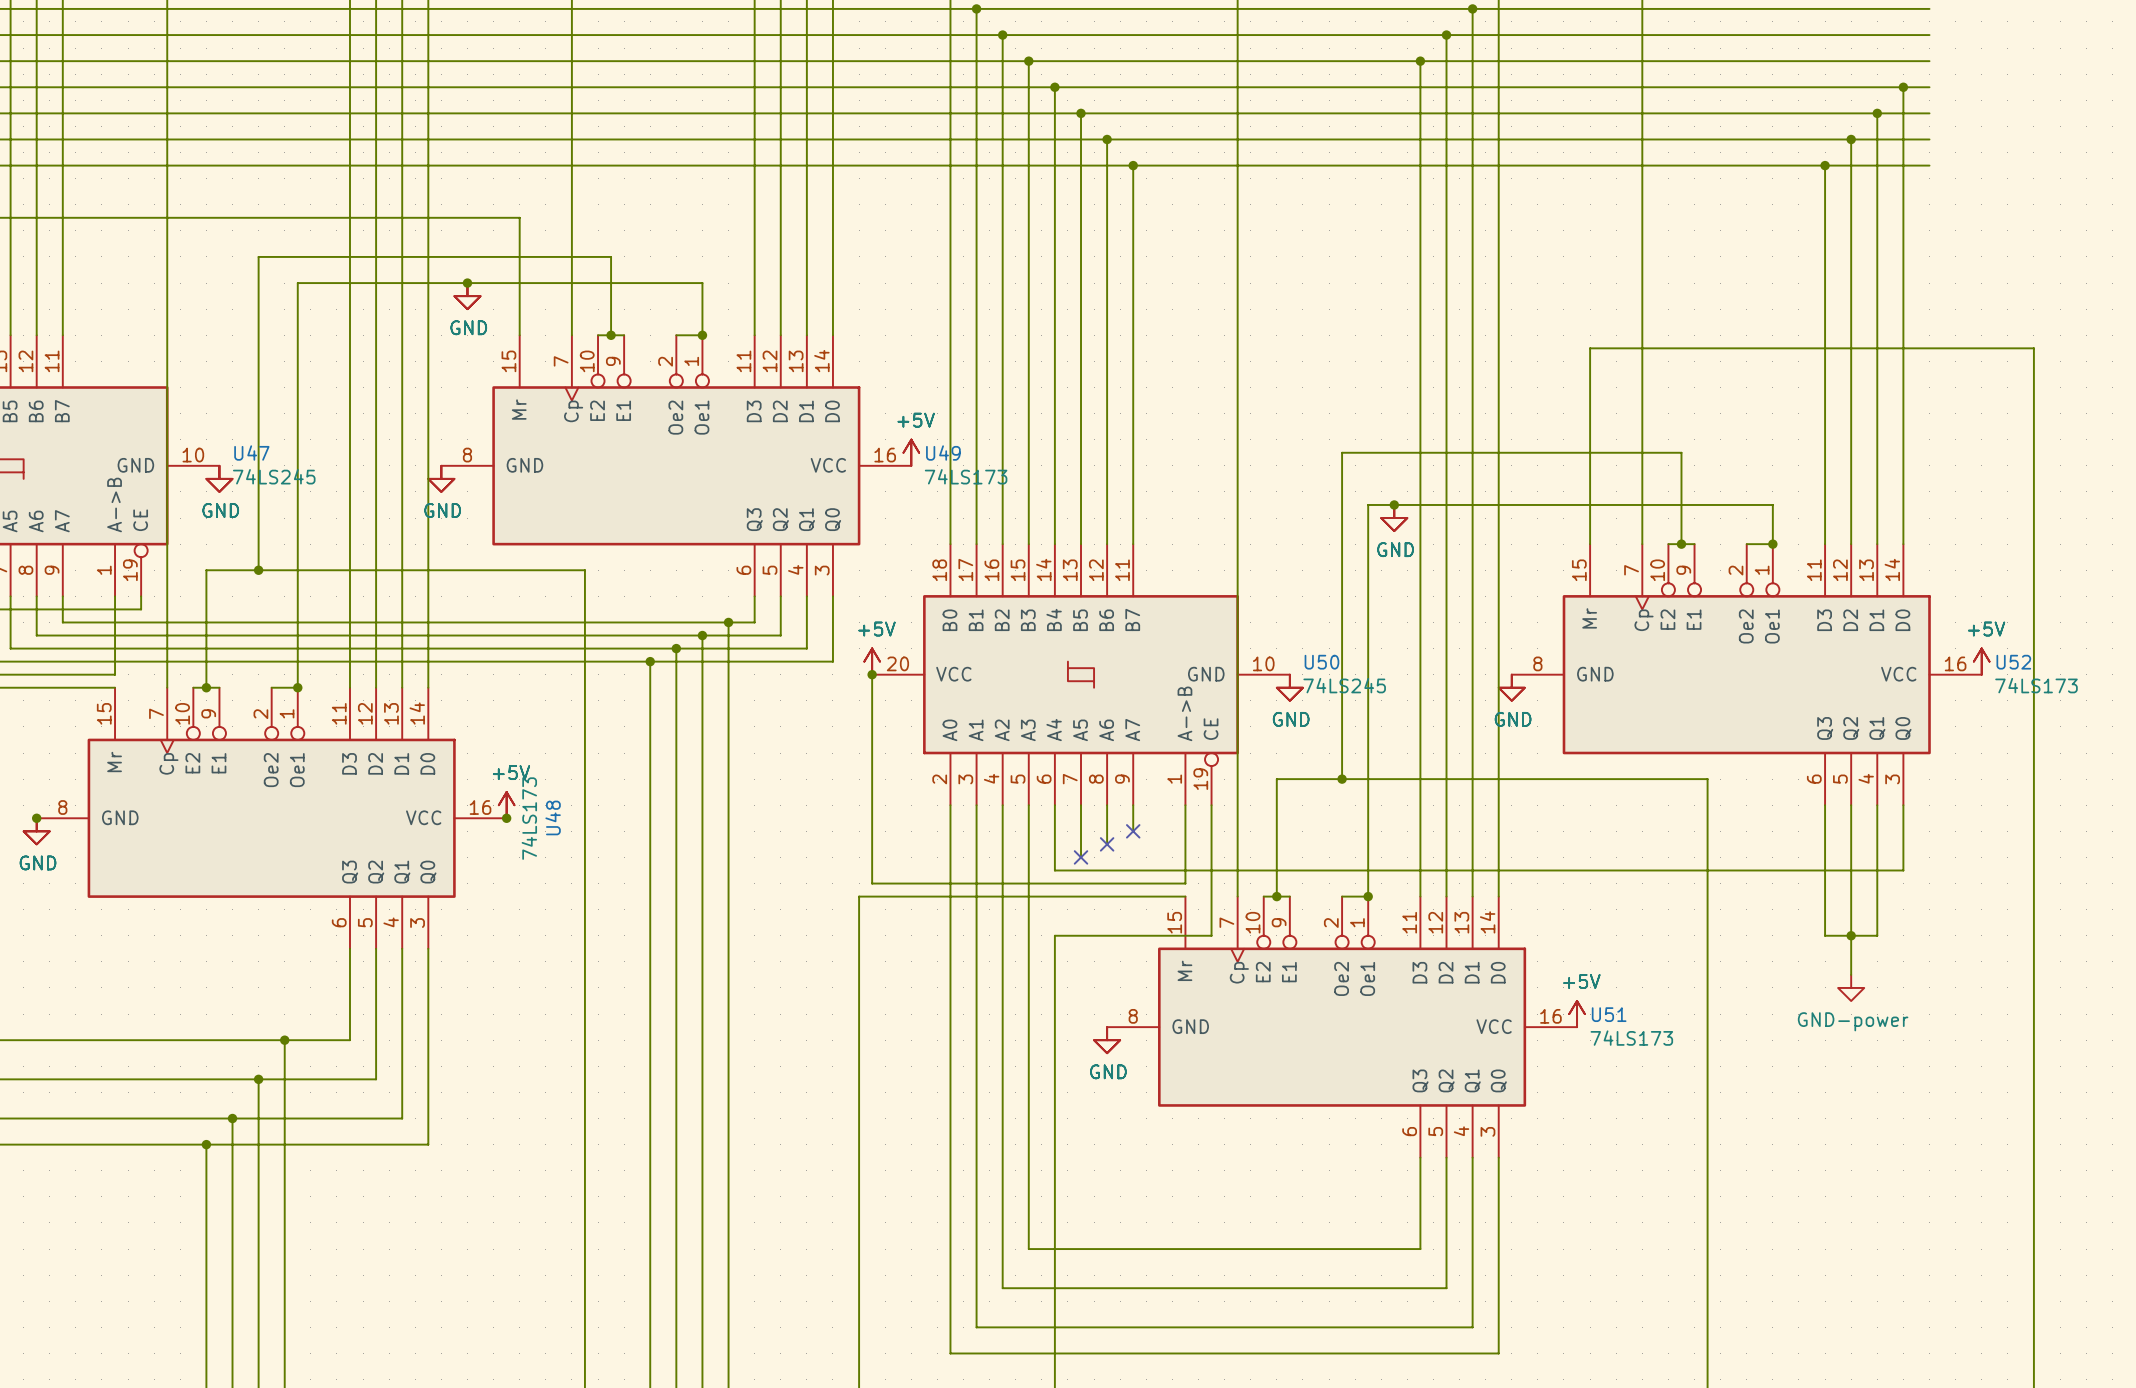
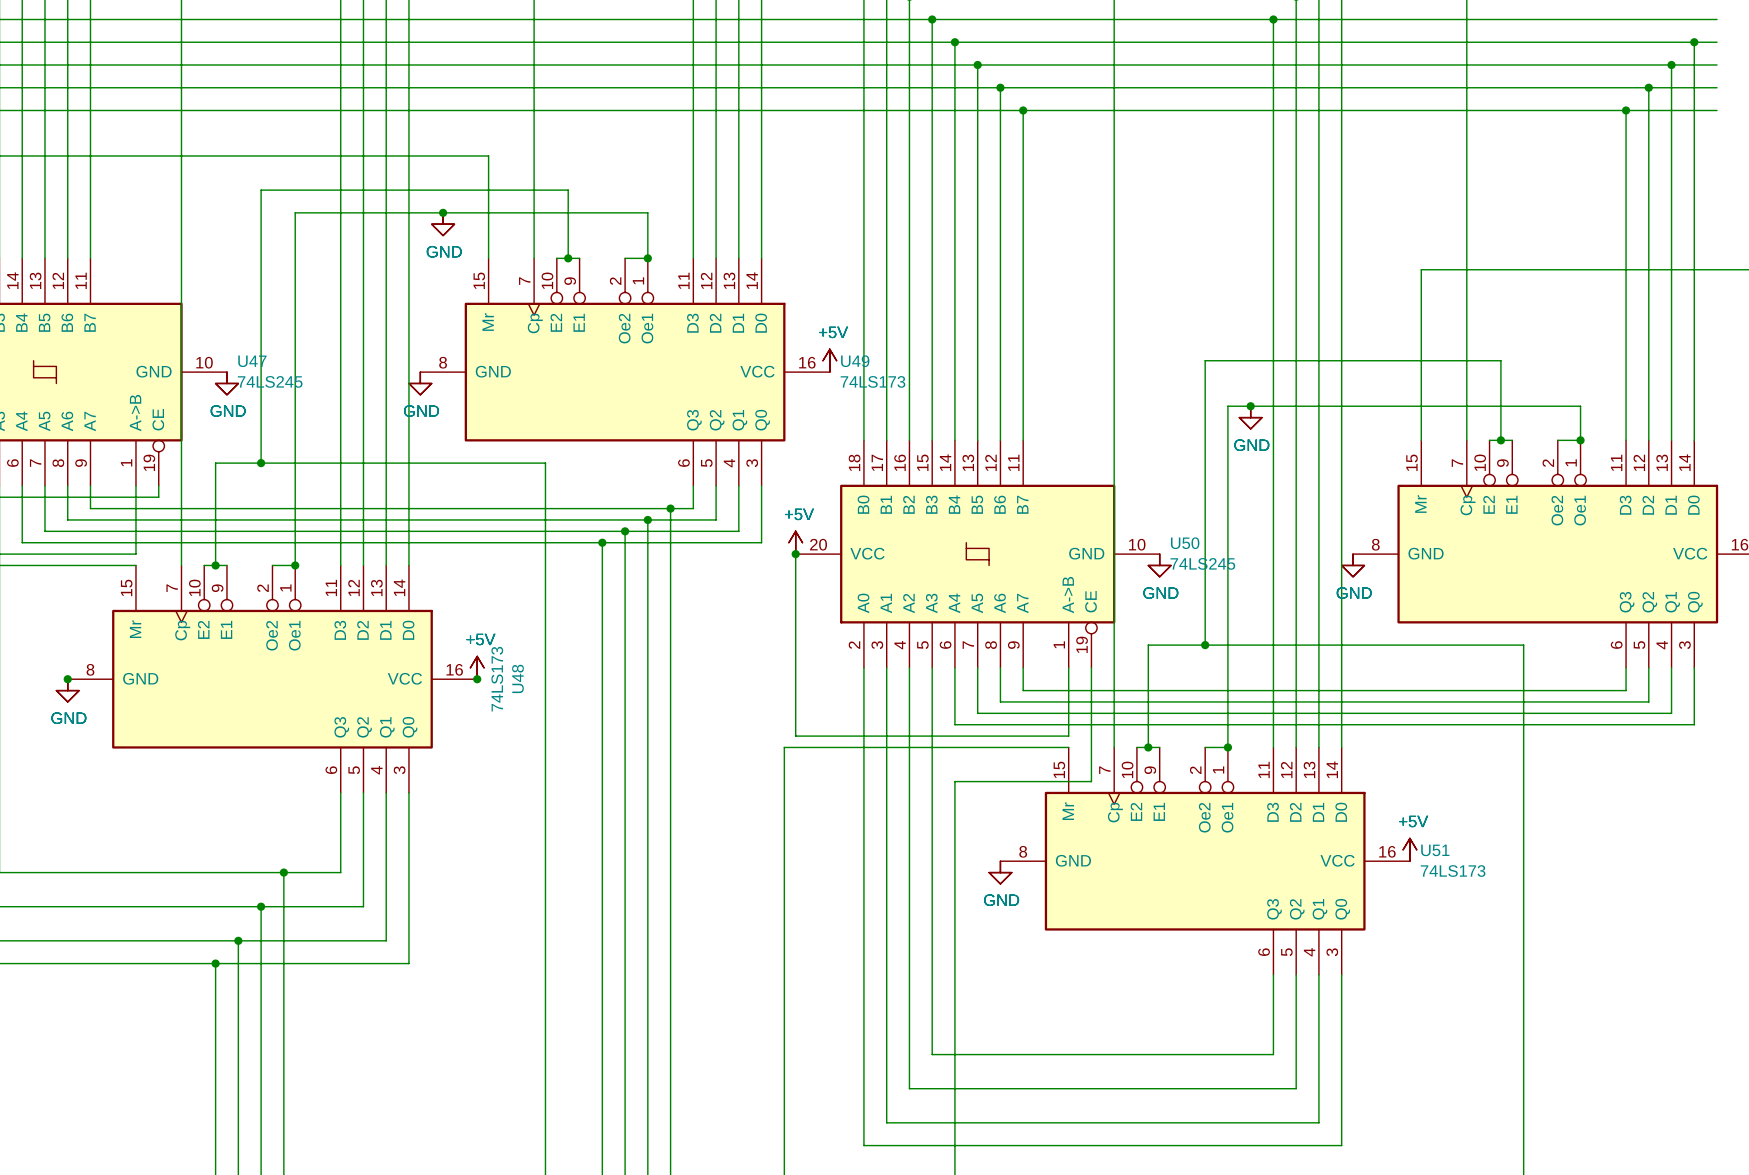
no-connect mark: (1133, 831) -> none
wire: (1825, 831) (1825, 935) (1877, 935) (1877, 857) -> (1626, 690) (1023, 690)
no-connect mark: (1107, 844) -> none
wire: (1851, 844) (1851, 974) -> (1648, 701) (1000, 701)
wire: none -> (977, 713) (1671, 713)
no-connect mark: (1081, 857) -> none
junction: (1851, 935) -> none
power symbol: GND-power (1851, 987) -> none

